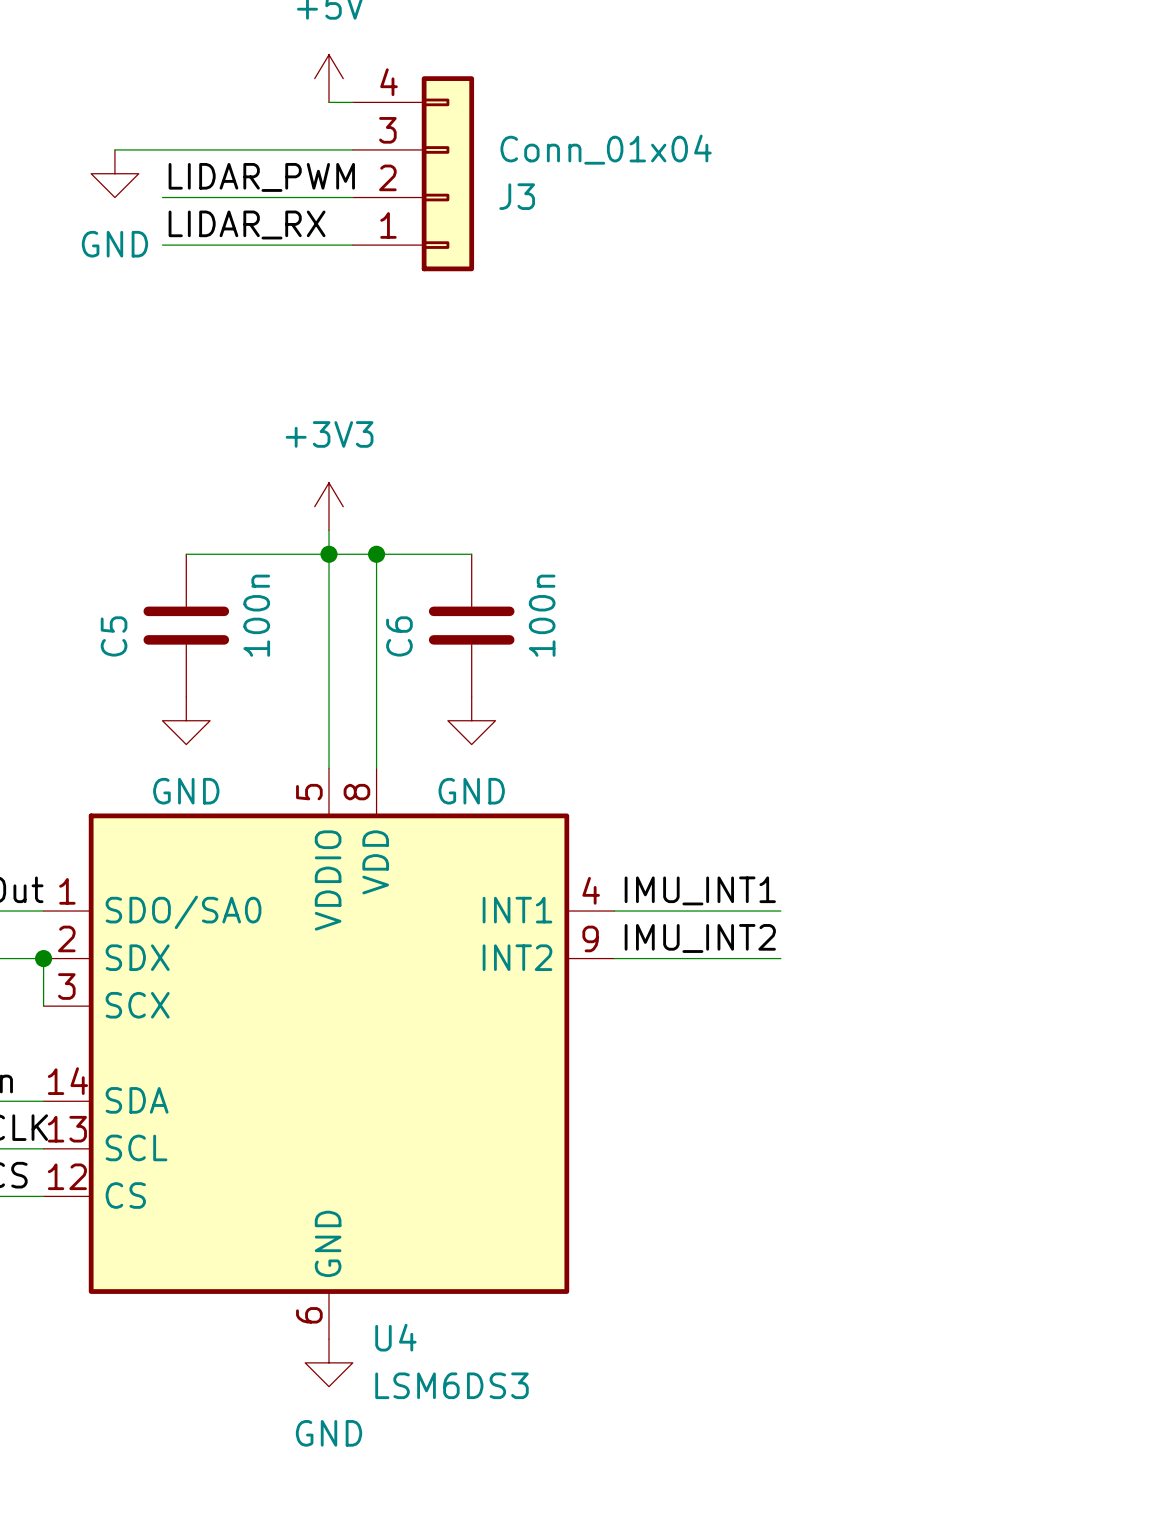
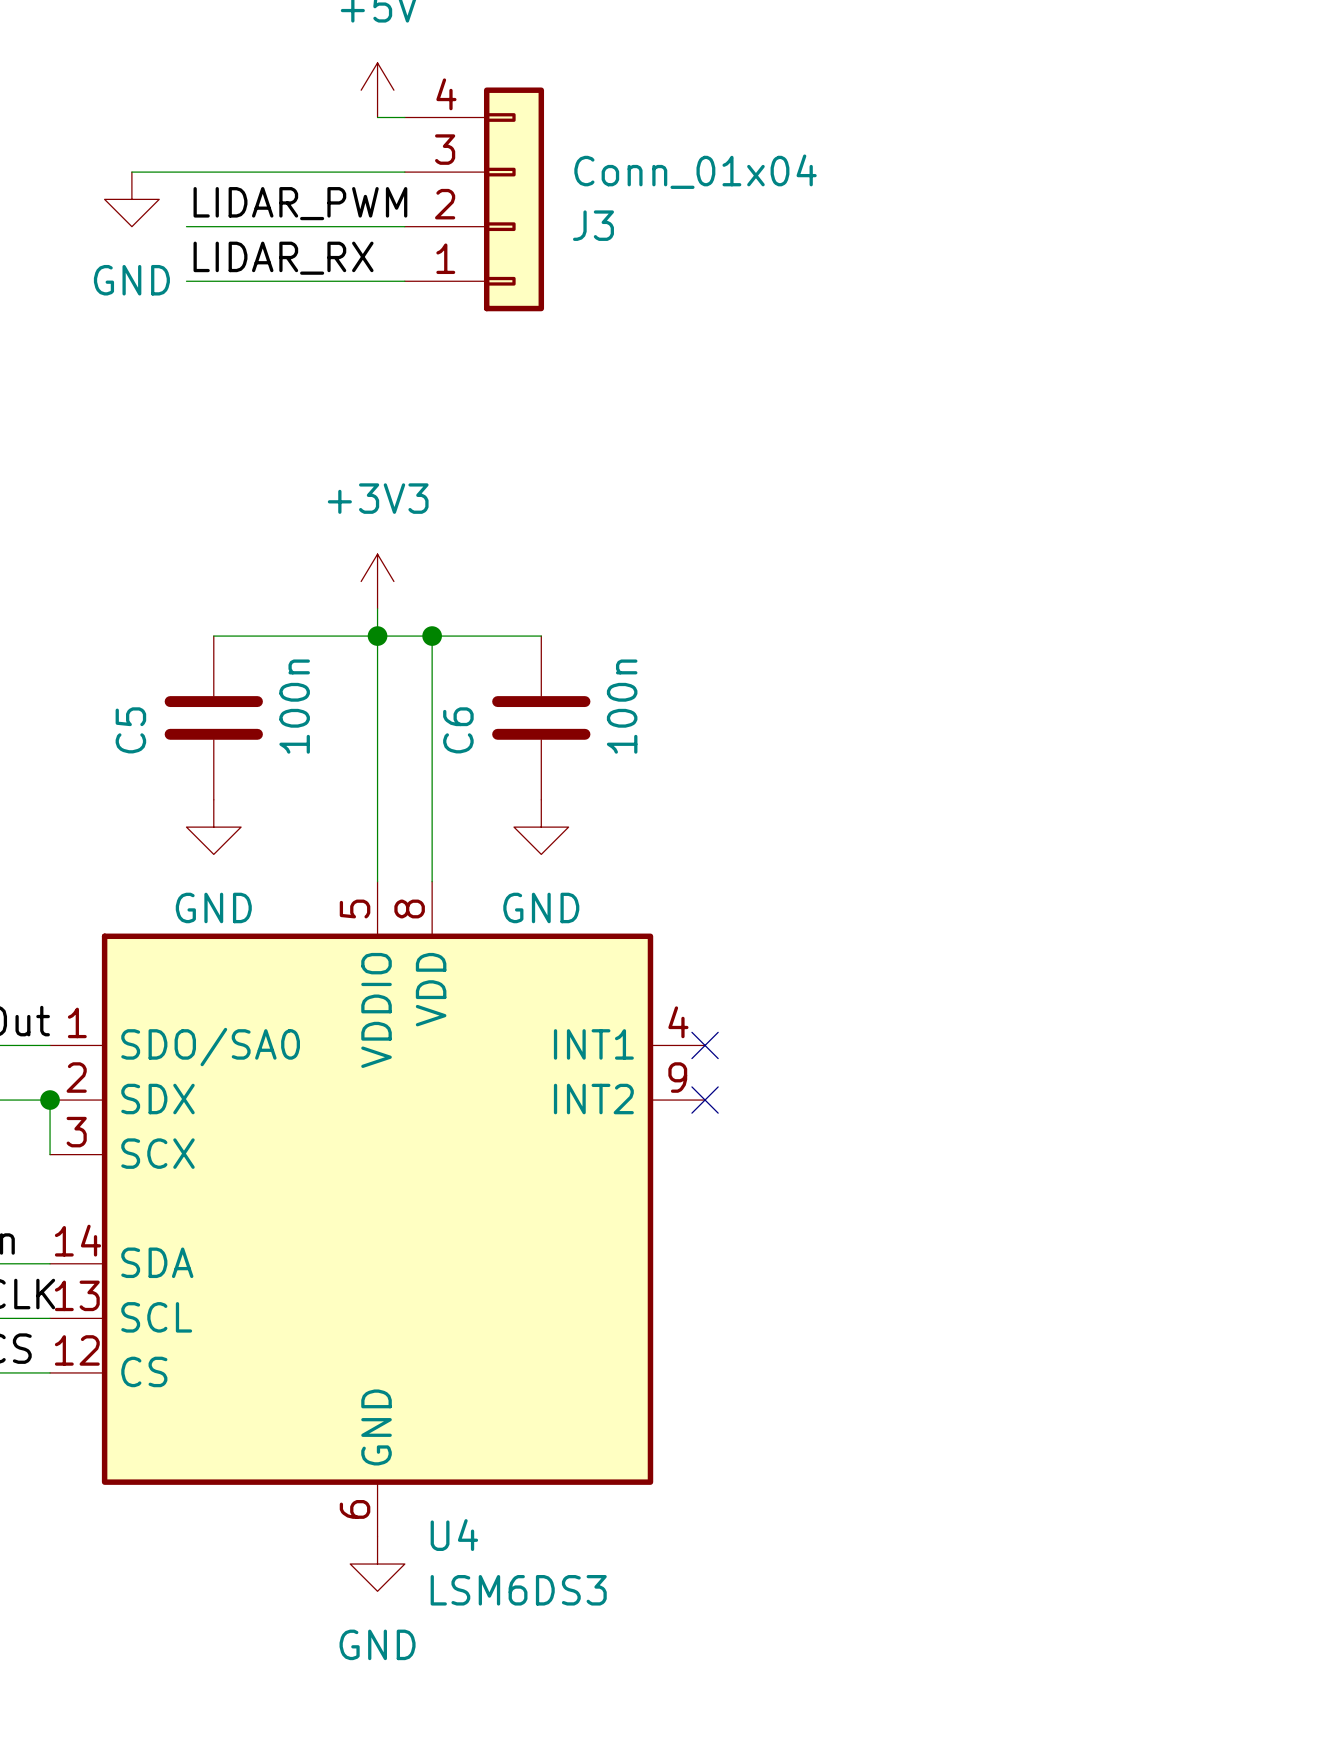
label: IMU_INT1 (700, 890) -> none
wire: (614, 911) (780, 911) -> none
no-connect mark: none -> (705, 1045)
label: IMU_INT2 (700, 938) -> none
wire: (614, 958) (780, 958) -> none
no-connect mark: none -> (705, 1100)

